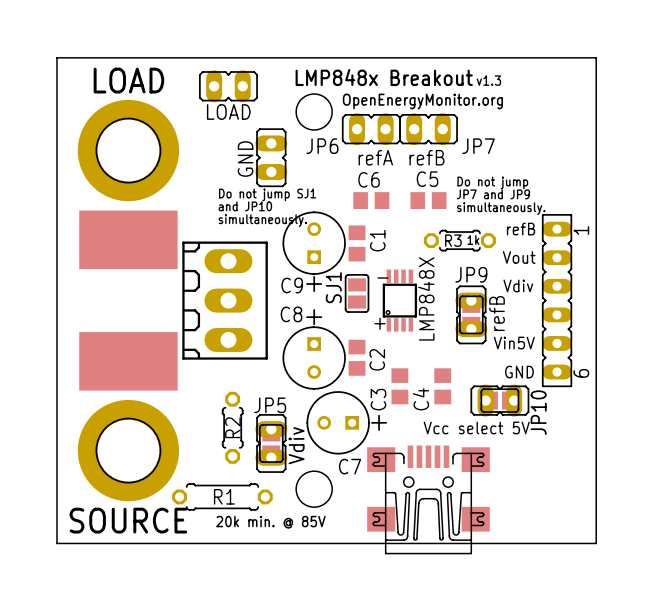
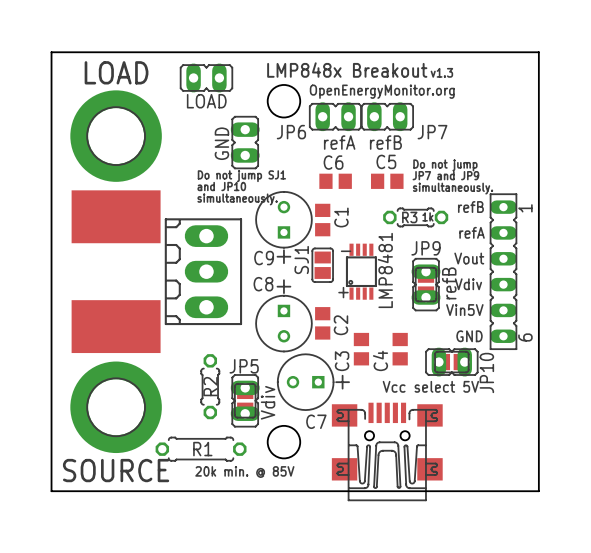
text: Vout (519, 257) -> refA (472, 232)
text: Vdiv (518, 285) -> Vout (469, 258)
LMP848X name: LMP848X (426, 298) -> LMP8481 (385, 270)
text: none -> Vdiv (468, 284)

